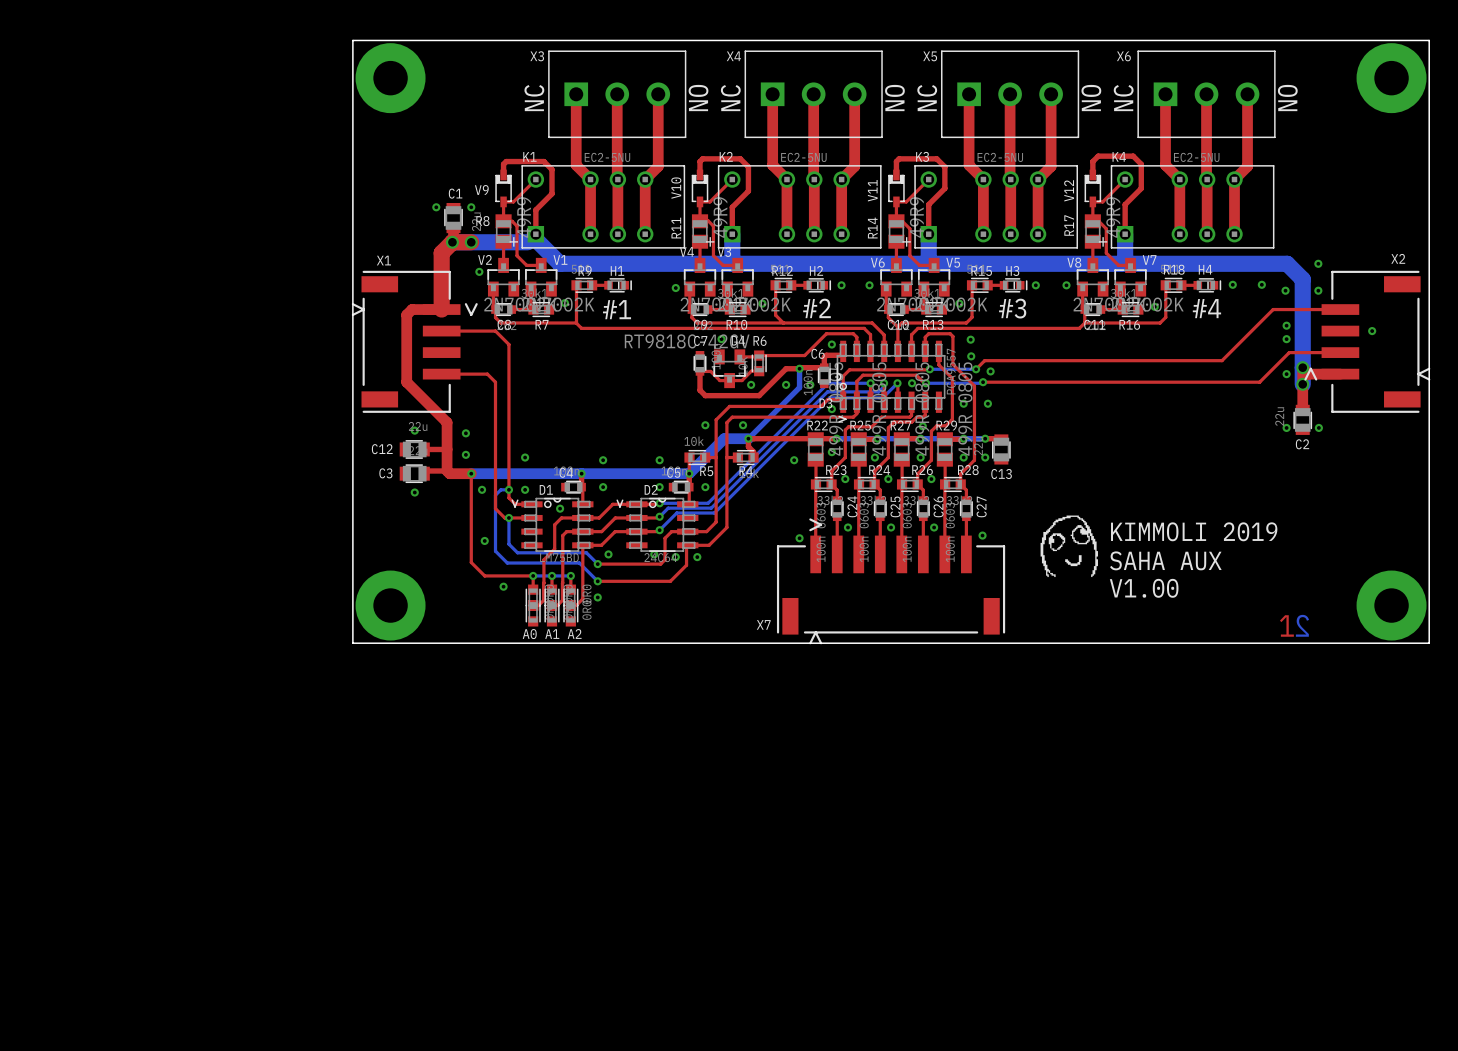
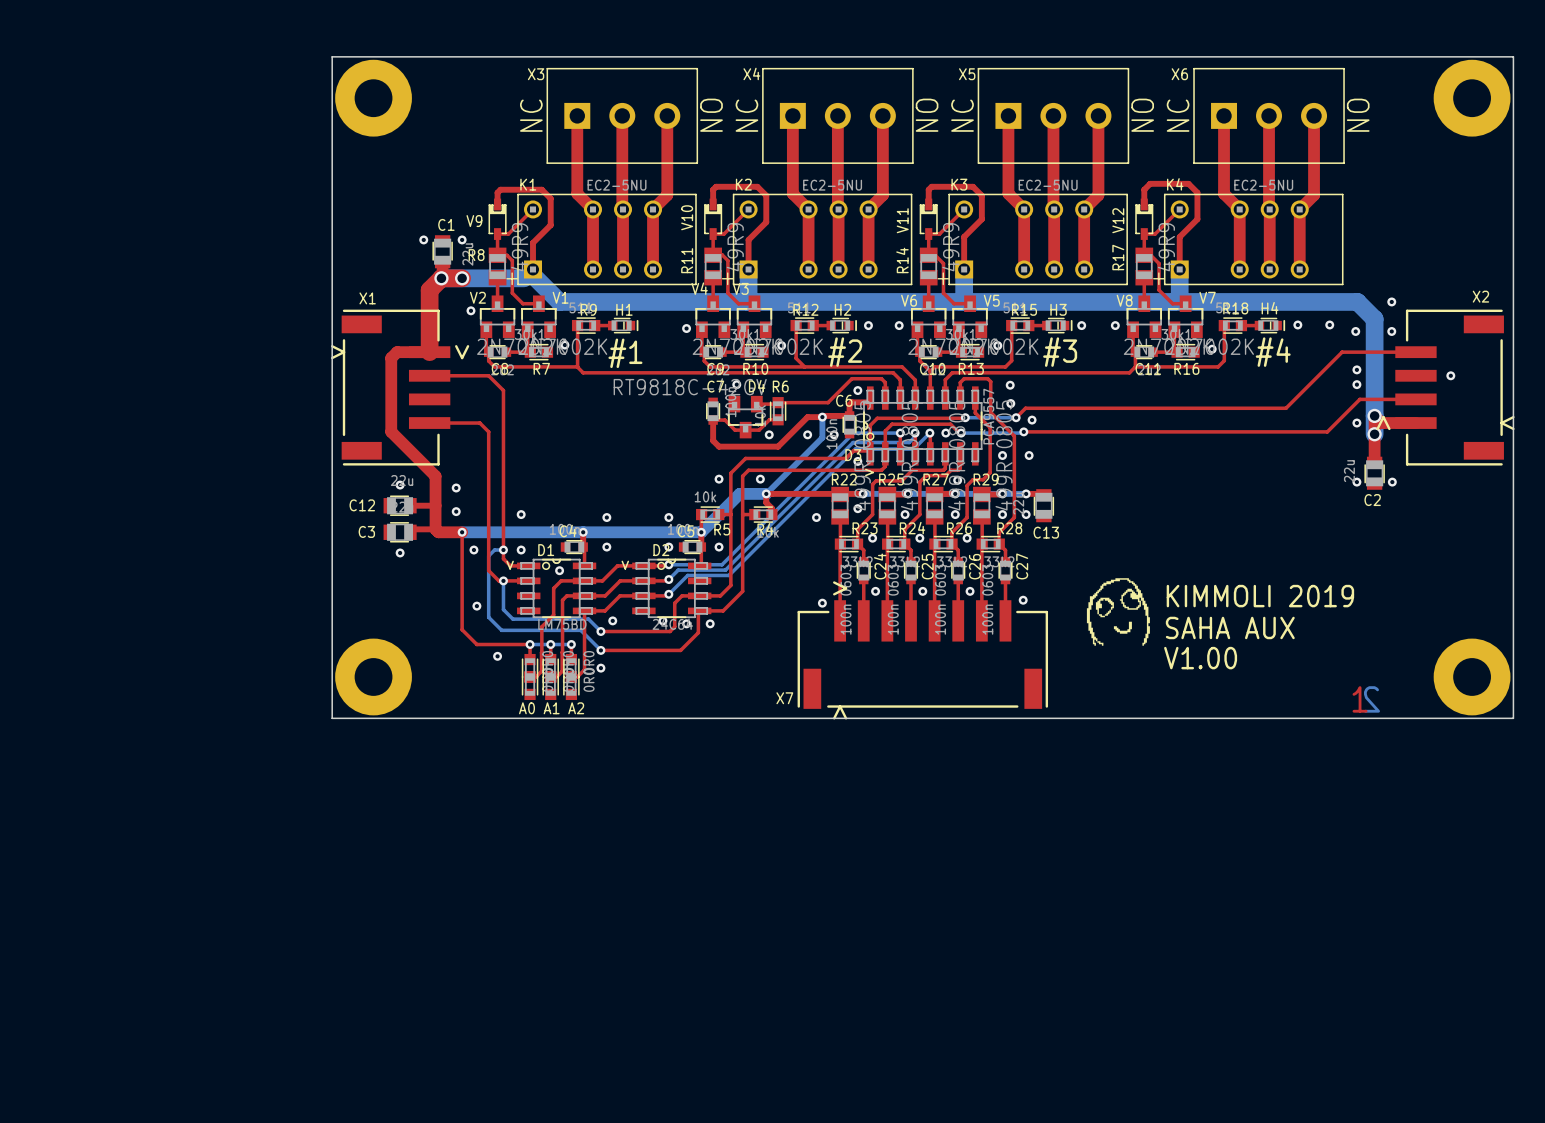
D3 footprint: [836, 340, 946, 423] -> [863, 386, 983, 477]

